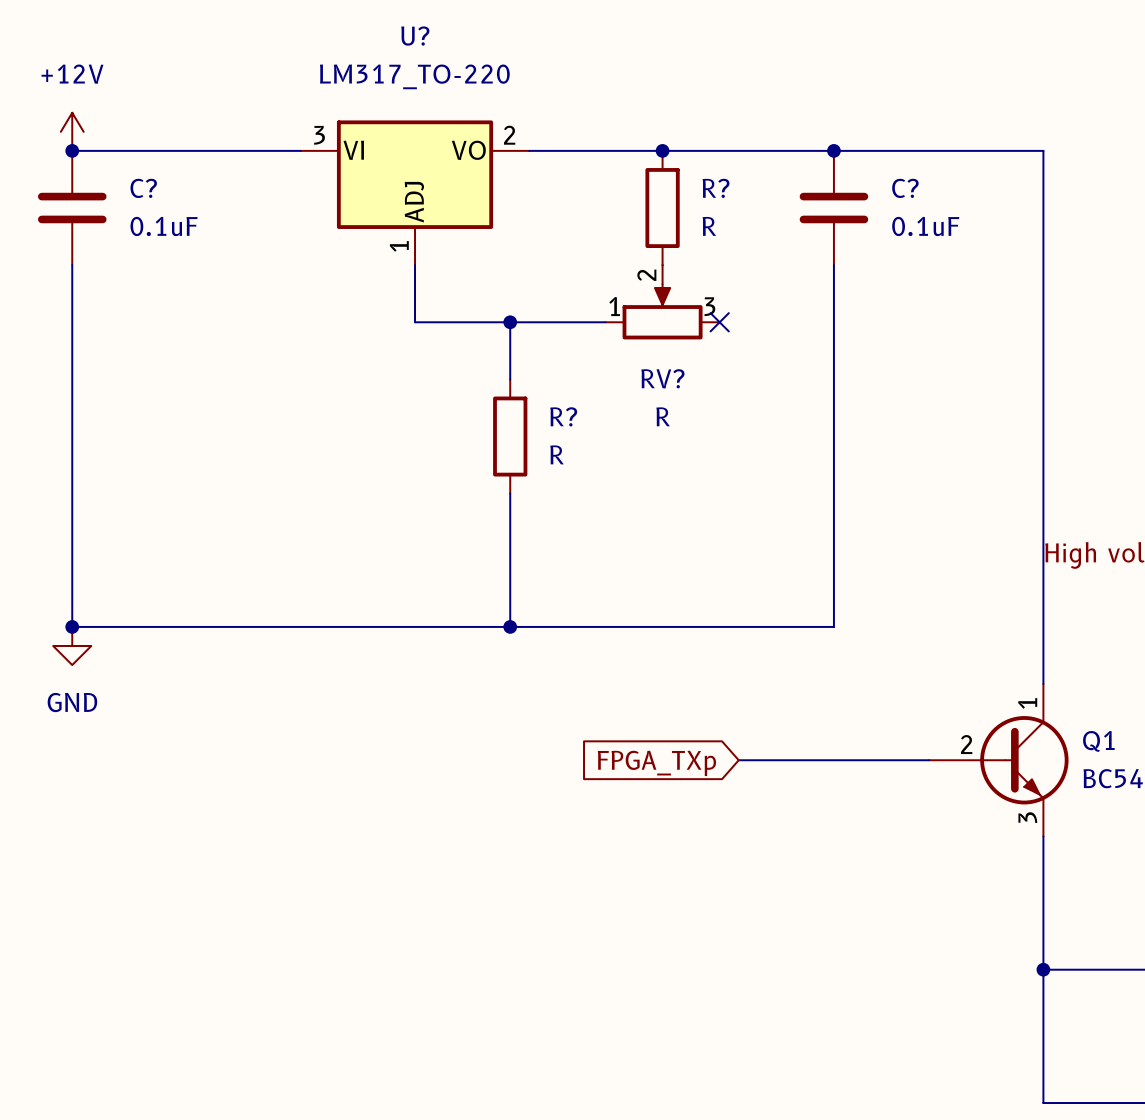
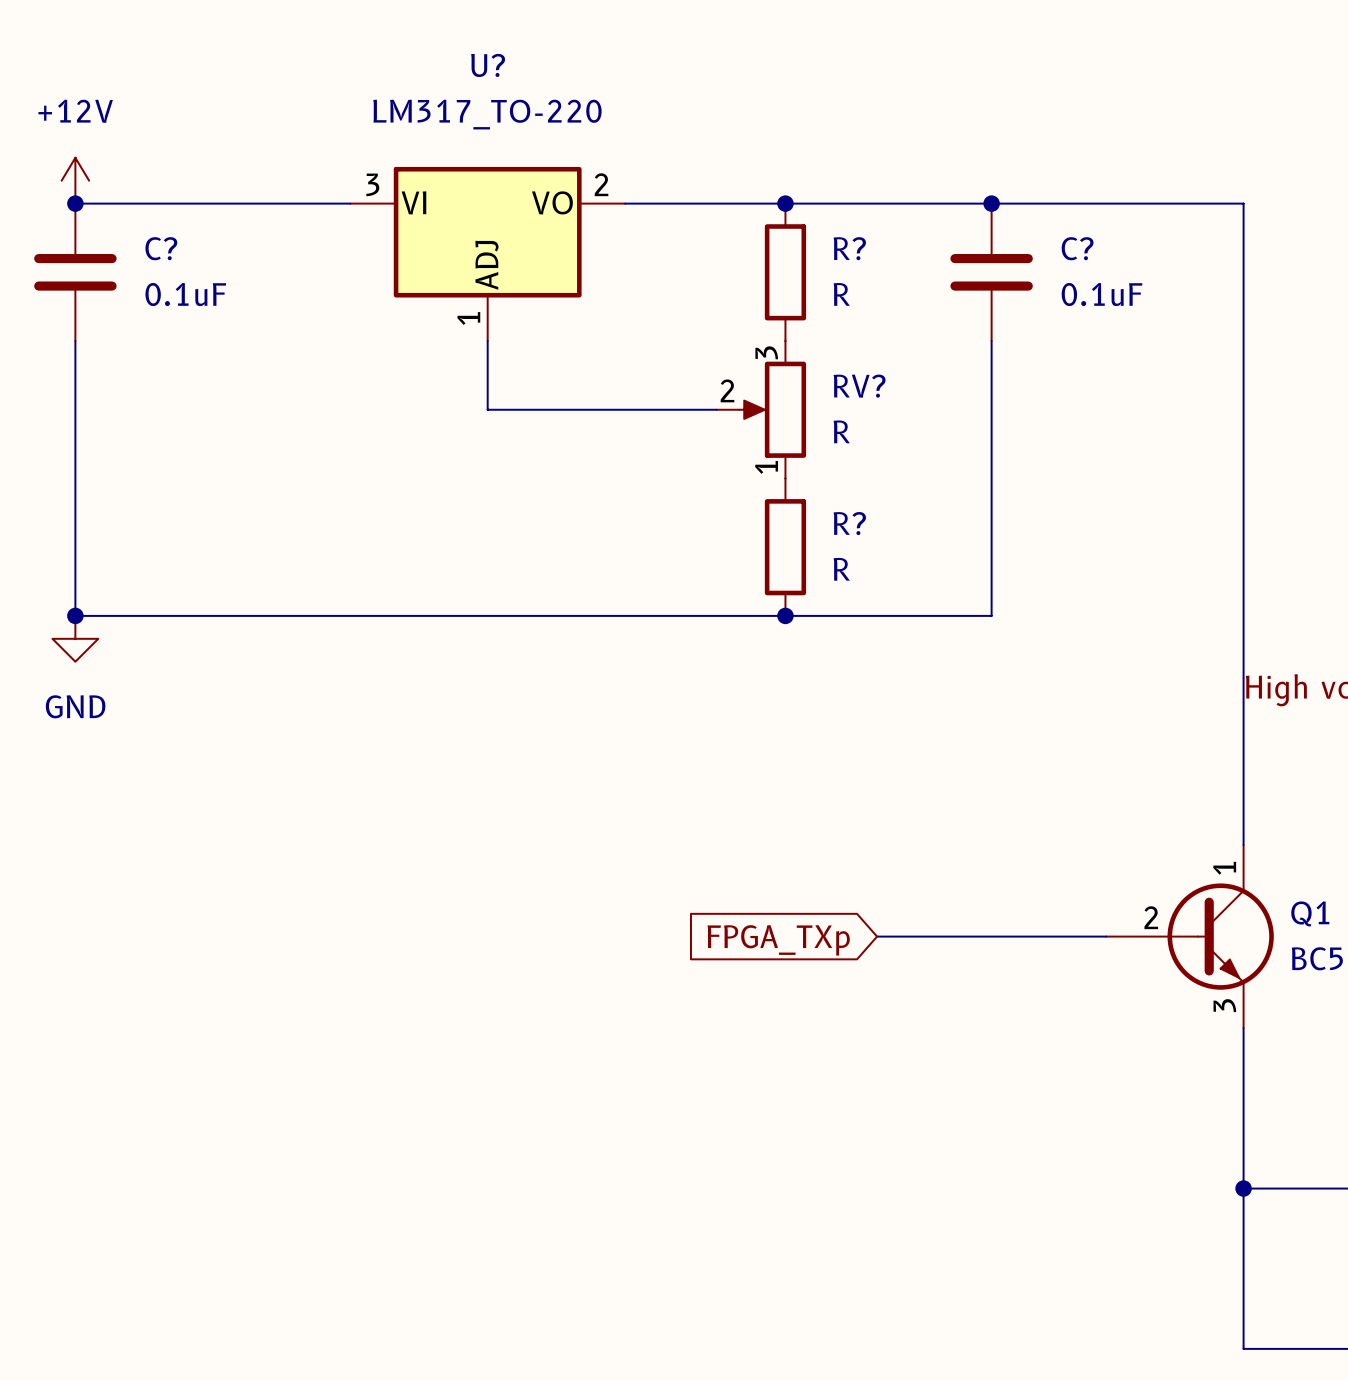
RV? rotation: 0° (662, 311) -> 90° counterclockwise (772, 409)
wire: (510, 322) (510, 379) -> none
junction: (510, 322) -> none
no-connect mark: (719, 322) -> none
RV? value position: R (663, 416) -> R (841, 431)
R? position: (510, 436) -> (785, 547)
wire: (72, 493) (72, 626) (833, 626) (833, 493) -> (75, 615) (991, 615)
junction: none -> (75, 615)
wire: (510, 493) (510, 626) -> none
junction: none -> (785, 615)
junction: (72, 626) -> none
junction: (510, 626) -> none
power symbol position: GND (72, 645) -> GND (75, 638)

